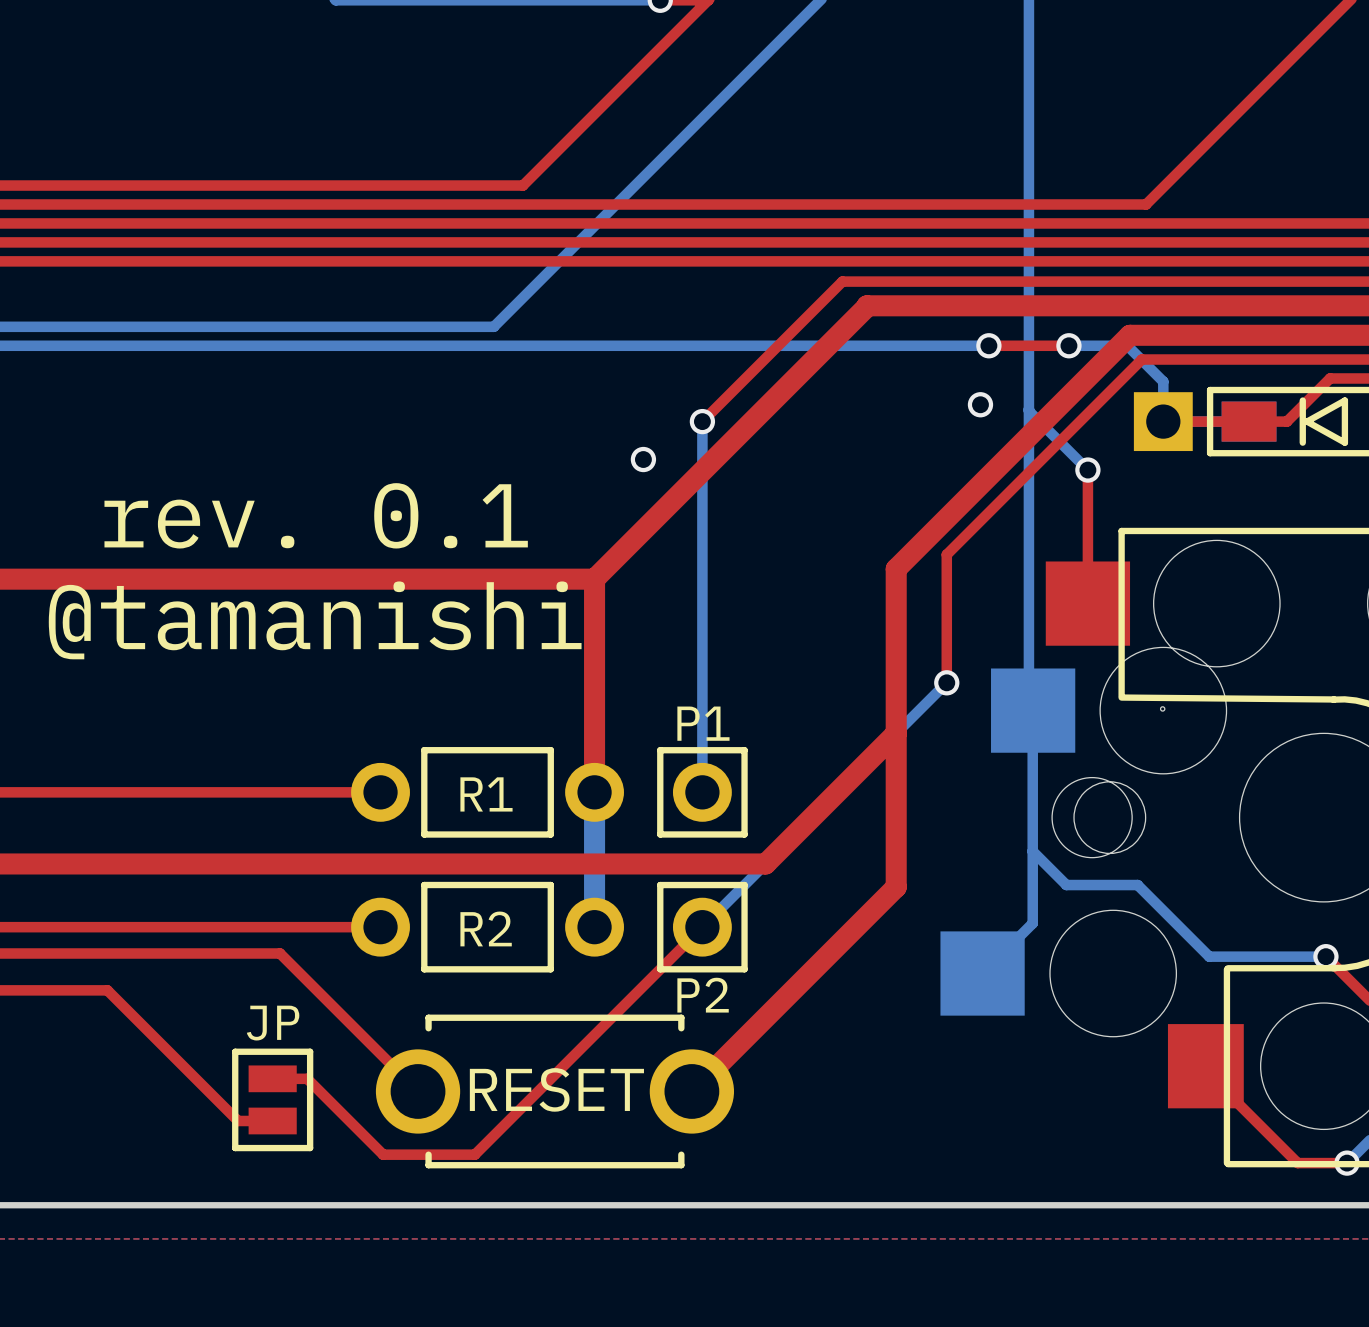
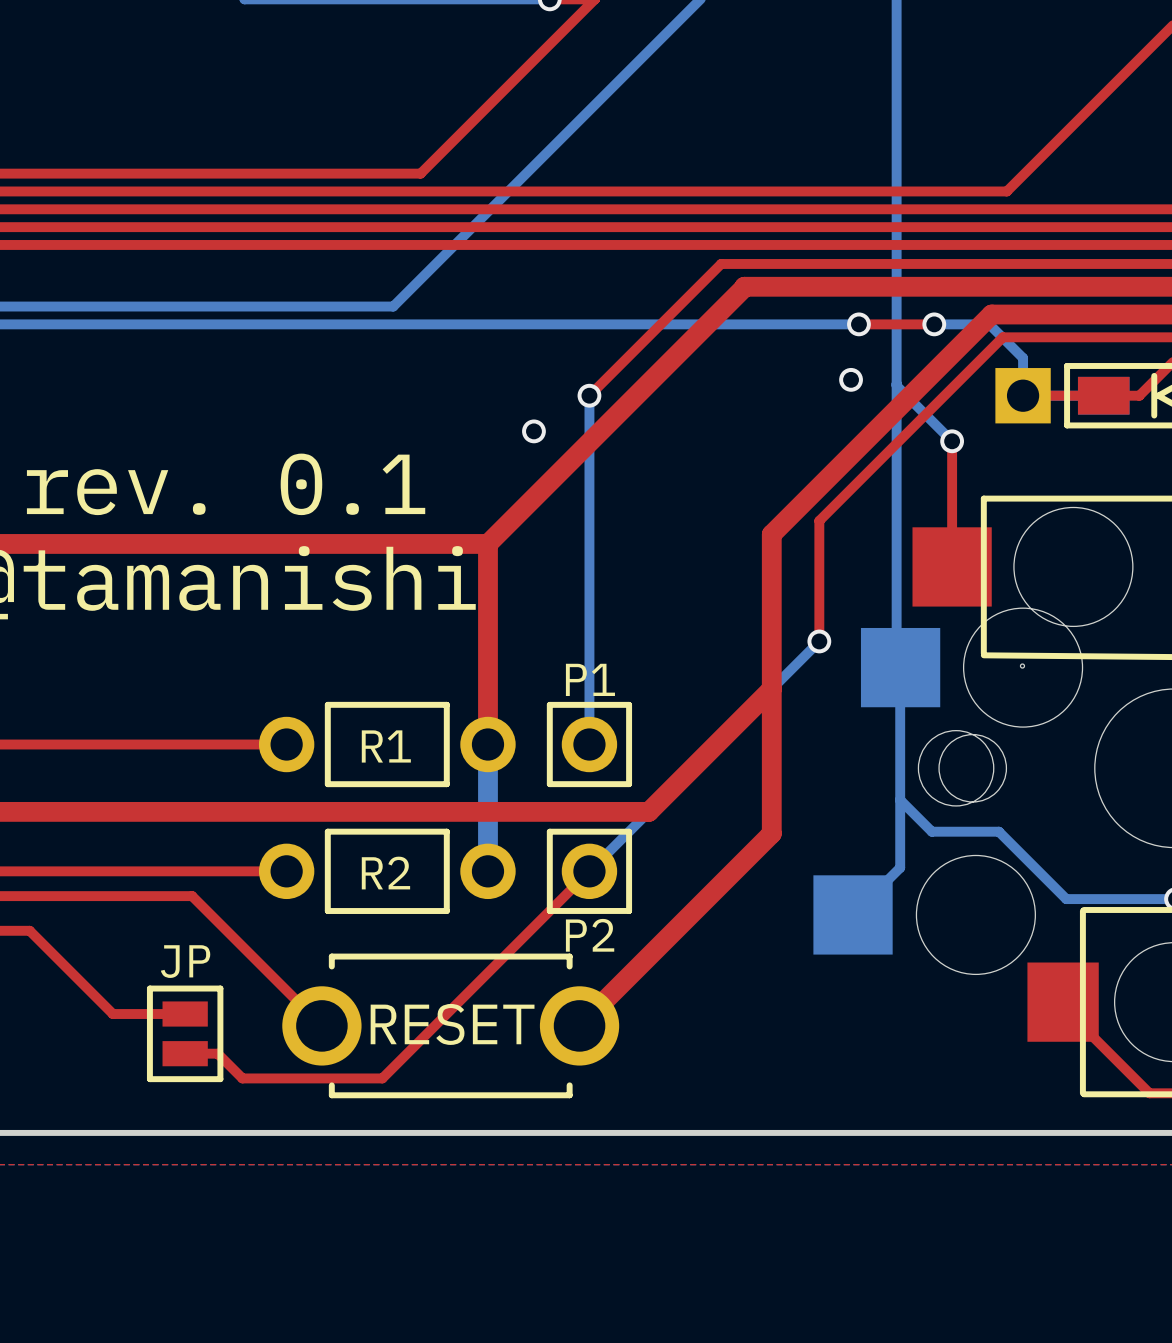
top track: (195, 1078) (238, 1120) (272, 1120) -> (112, 1014) (185, 1014)
top track: (272, 1078) (307, 1078) (383, 1154) (474, 1154) (482, 1147) -> (185, 1053) (217, 1053) (242, 1078) (382, 1078)

